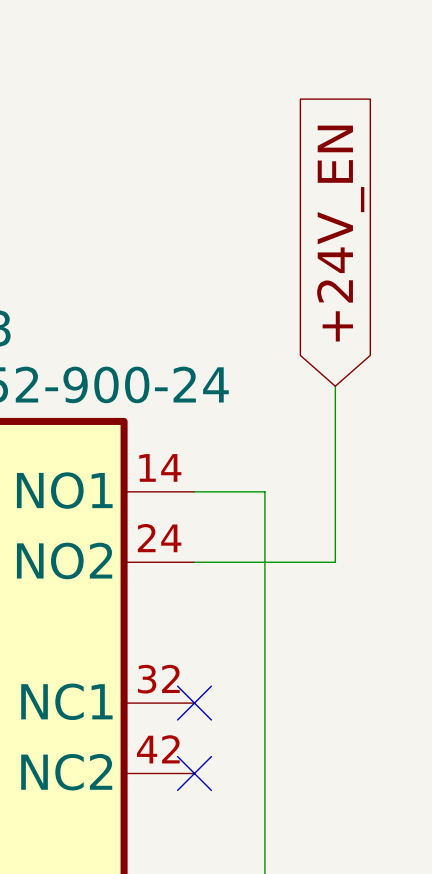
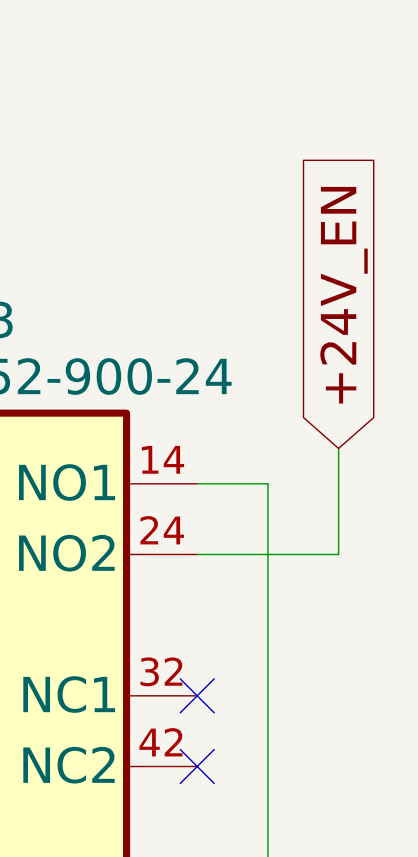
global label position: +24V_EN (340, 233) -> +24V_EN (343, 295)
wire: (335, 386) (335, 456) -> none

